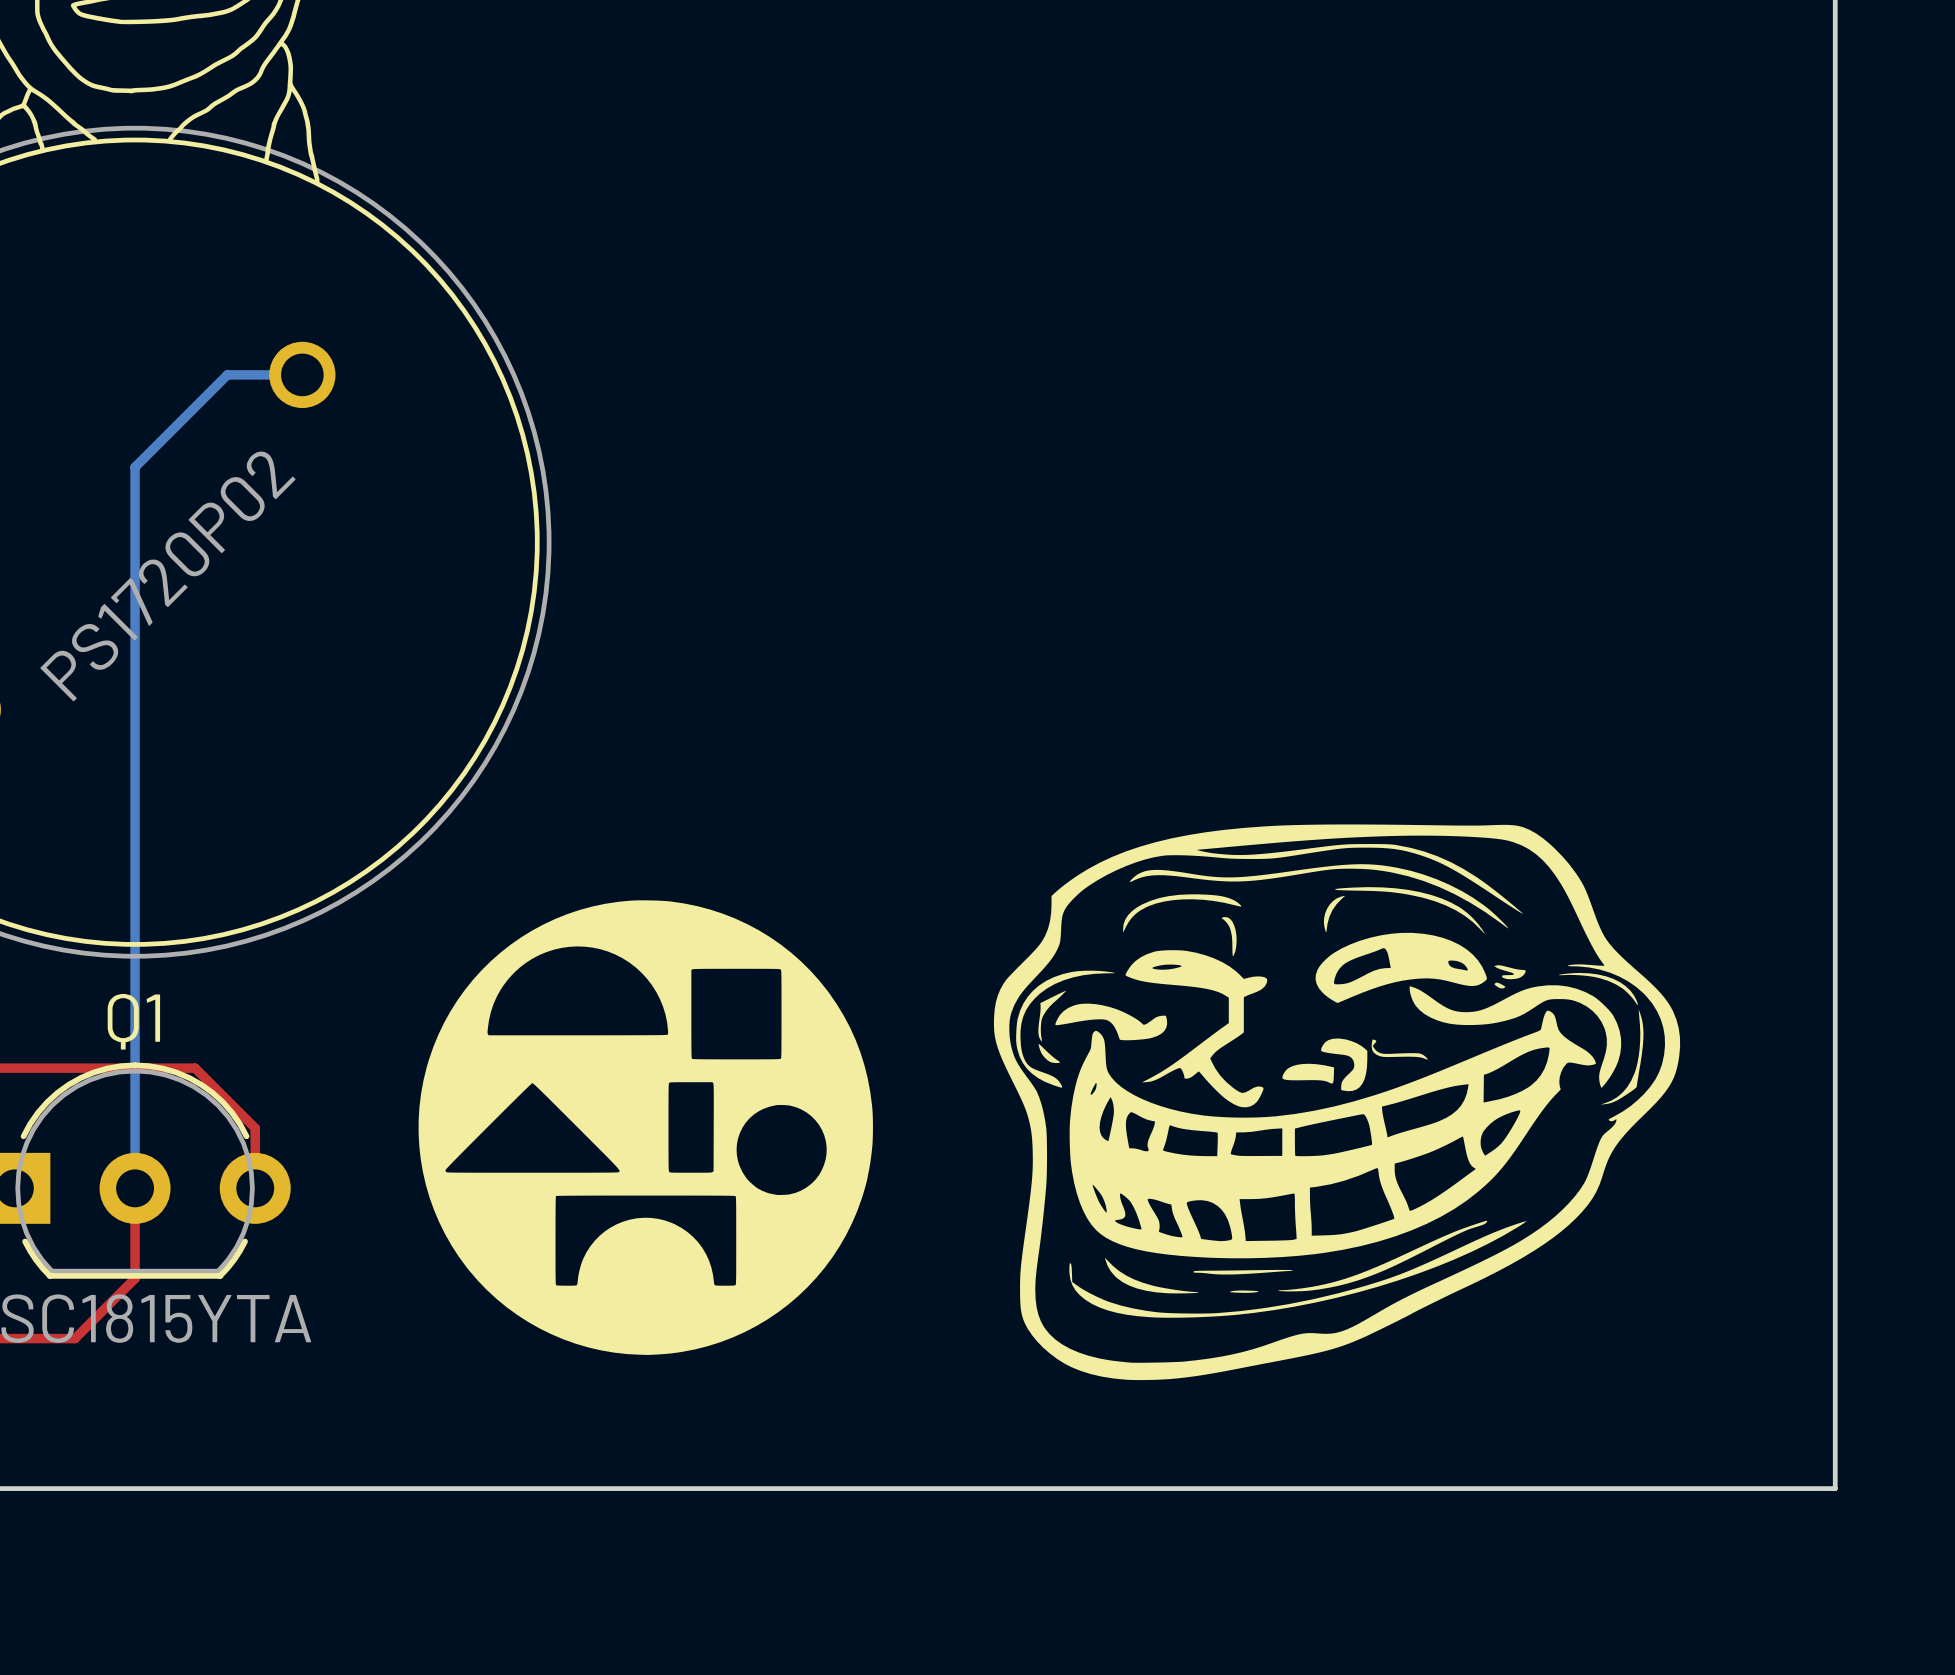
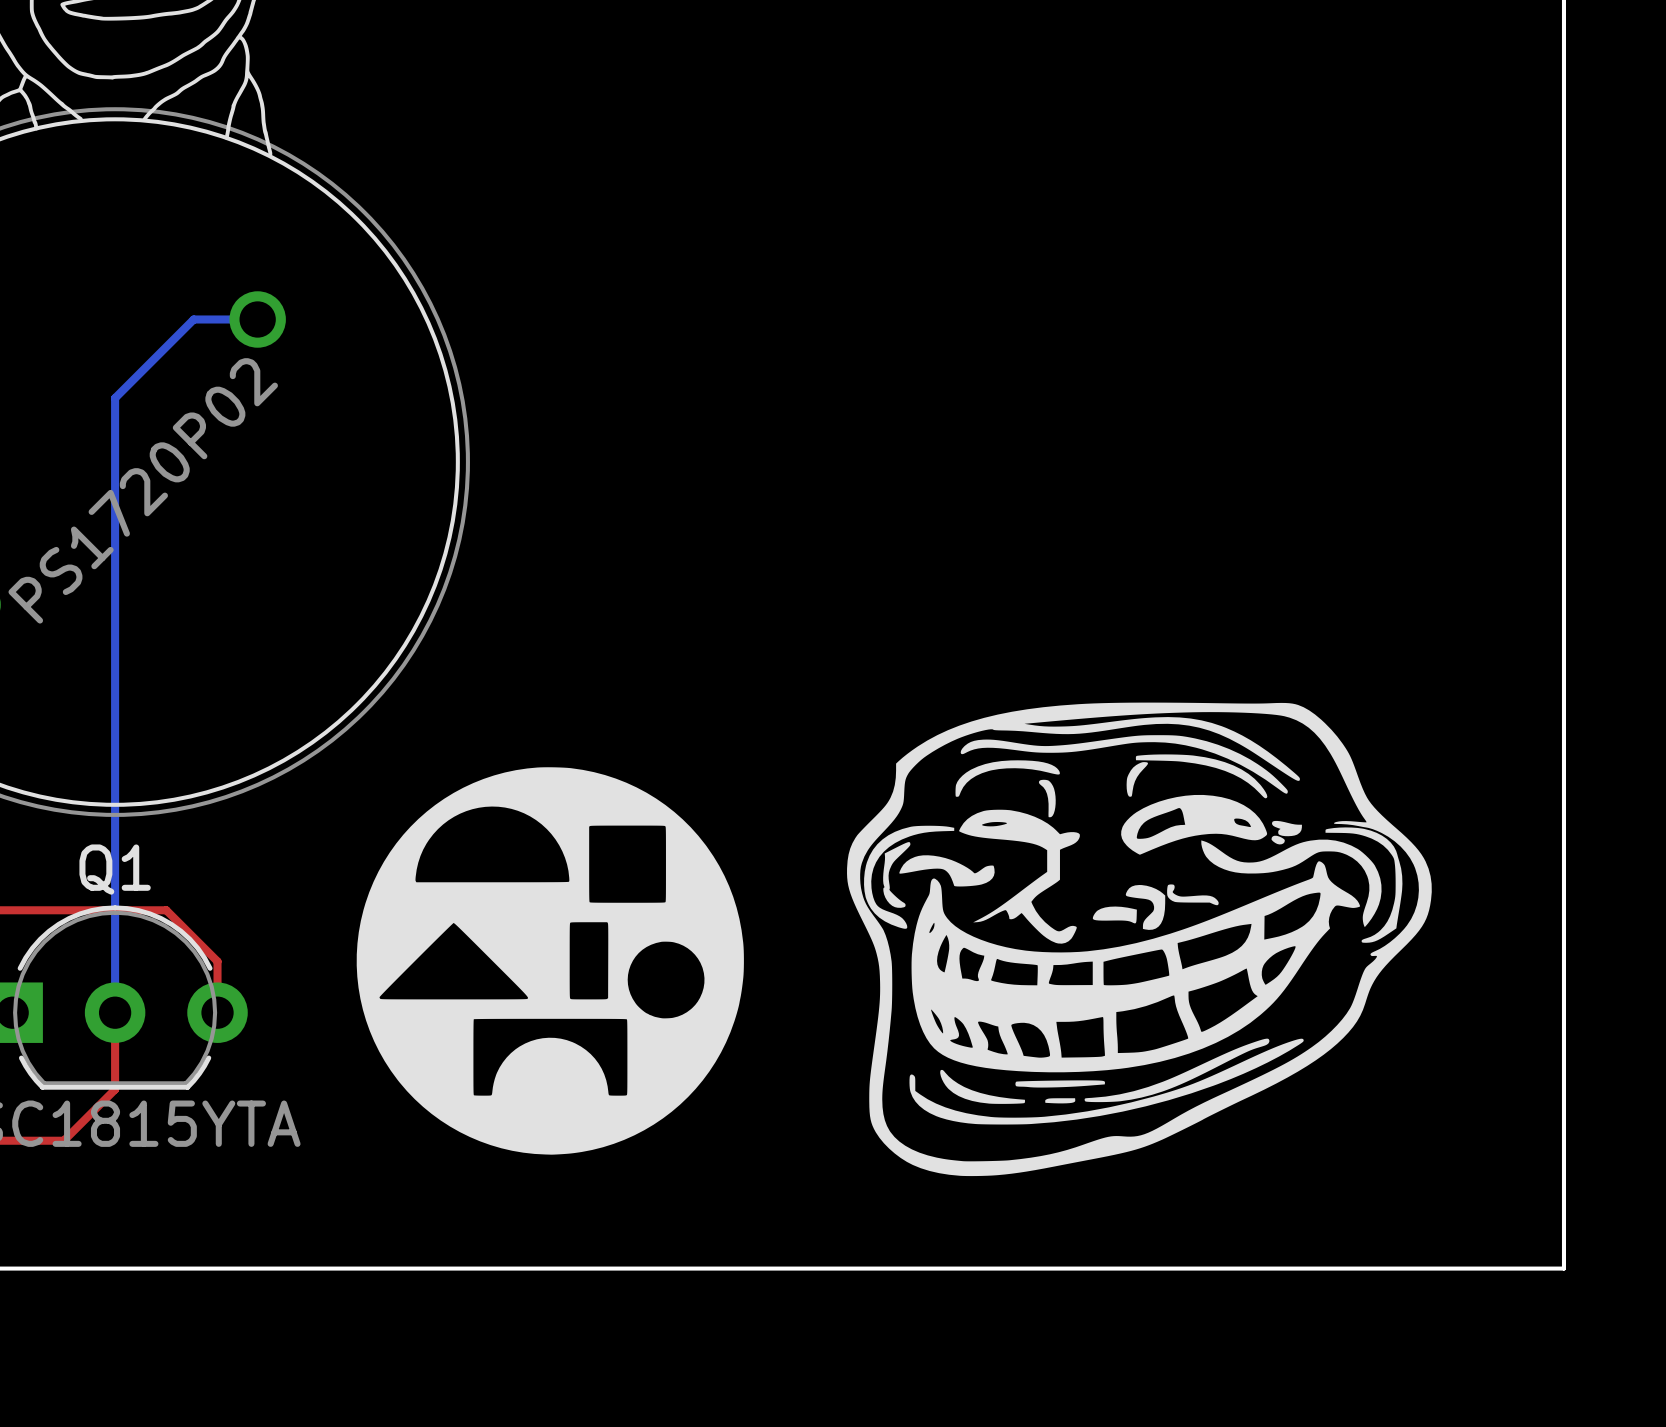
drawing shape: [993, 824, 1681, 1381] -> [847, 702, 1432, 1177]

